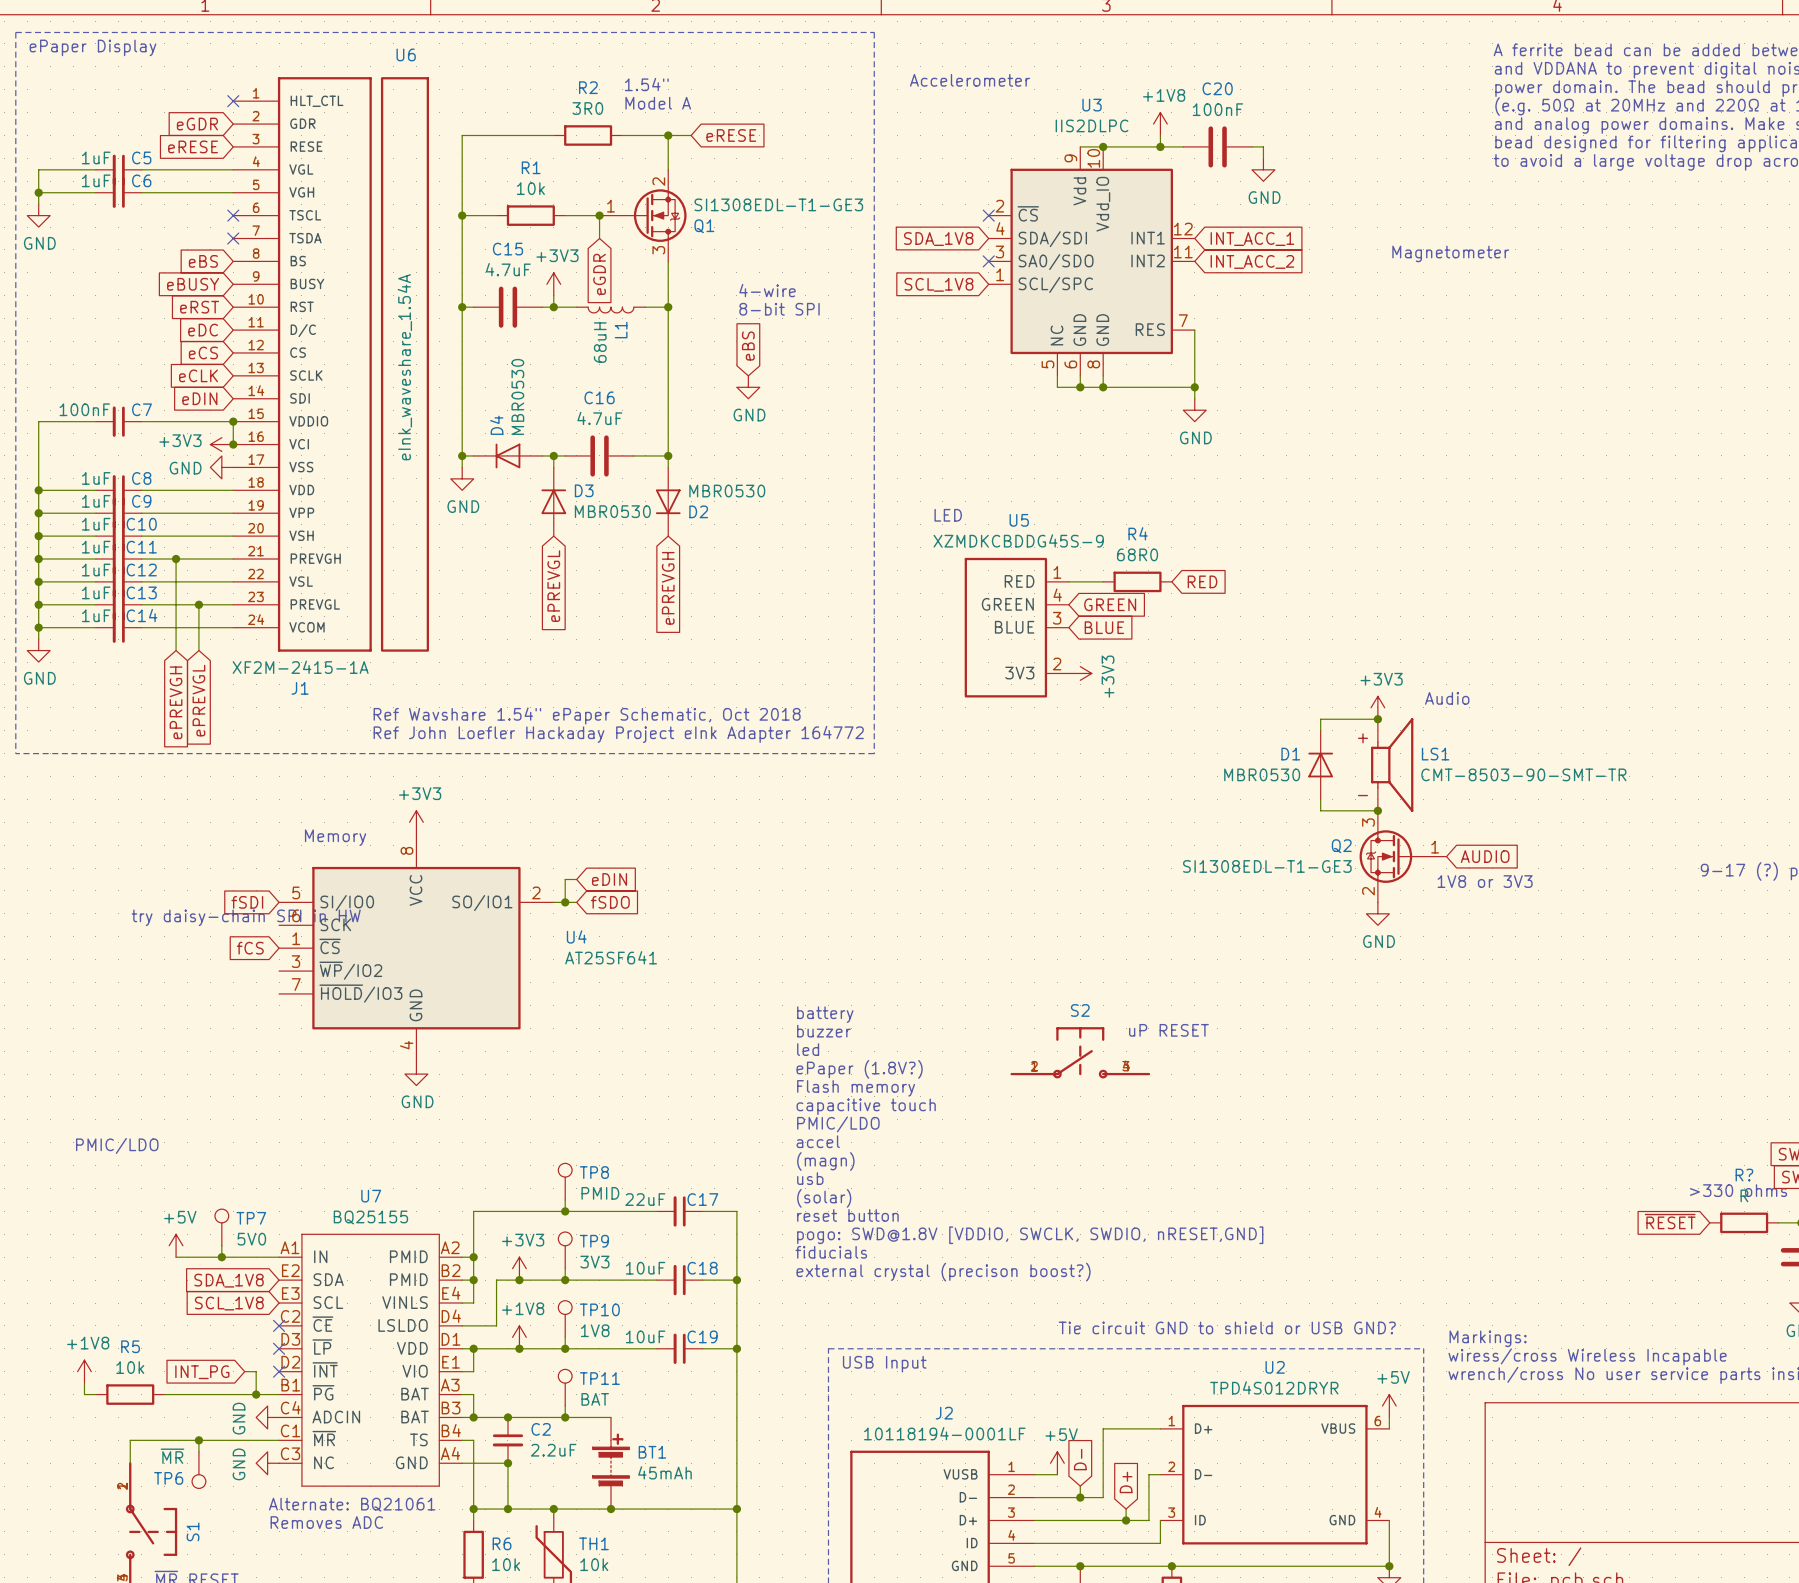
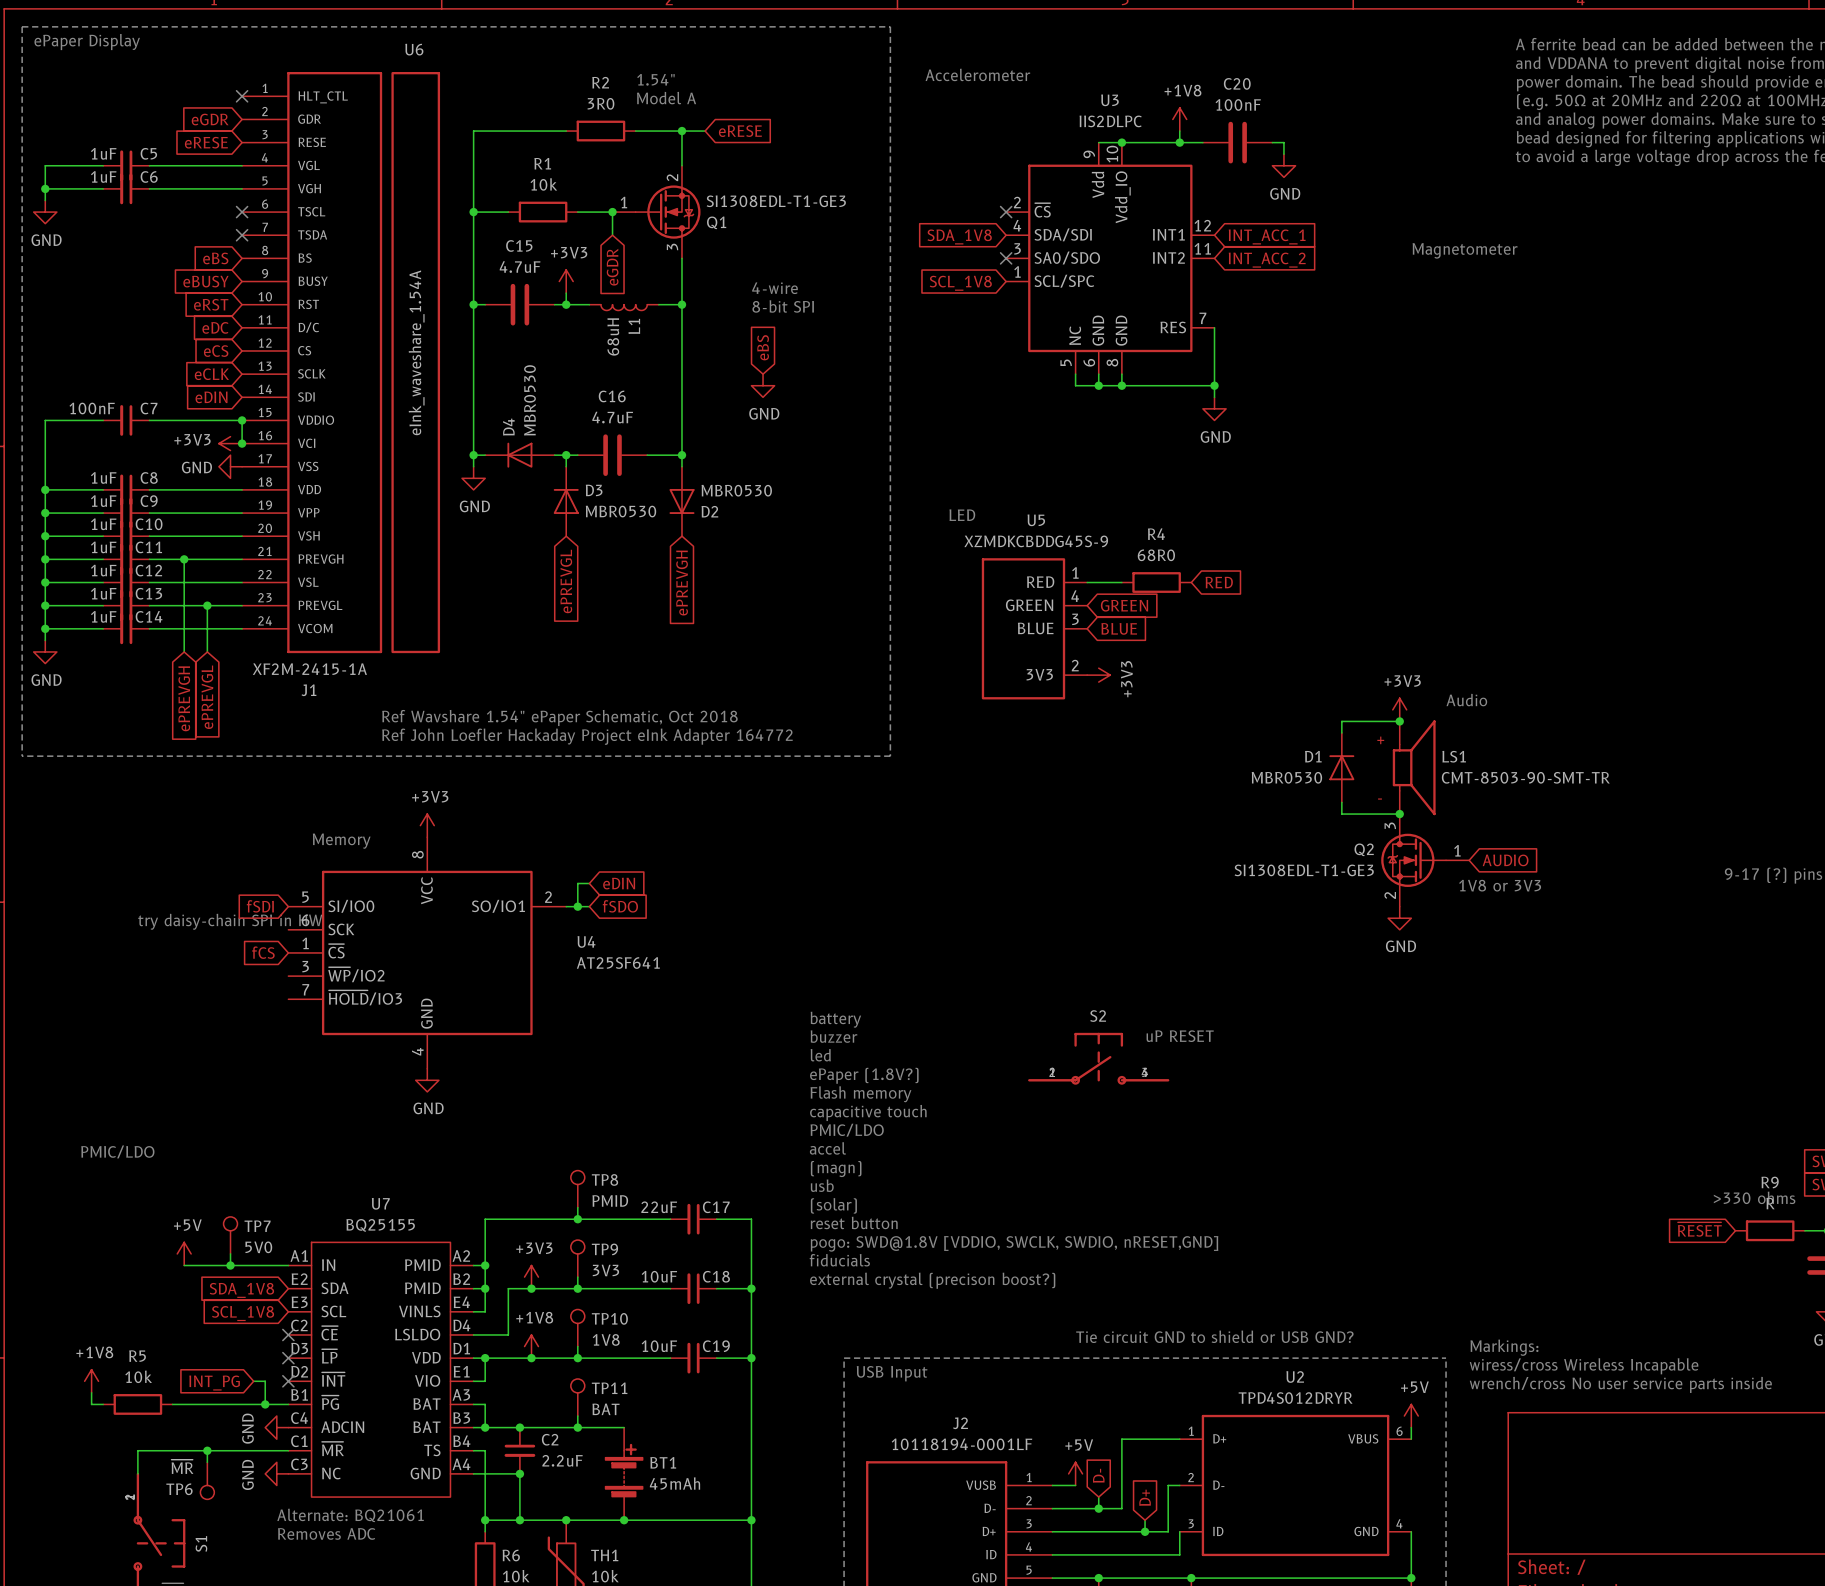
R? name: R? (1744, 1175) -> R9 (1770, 1182)

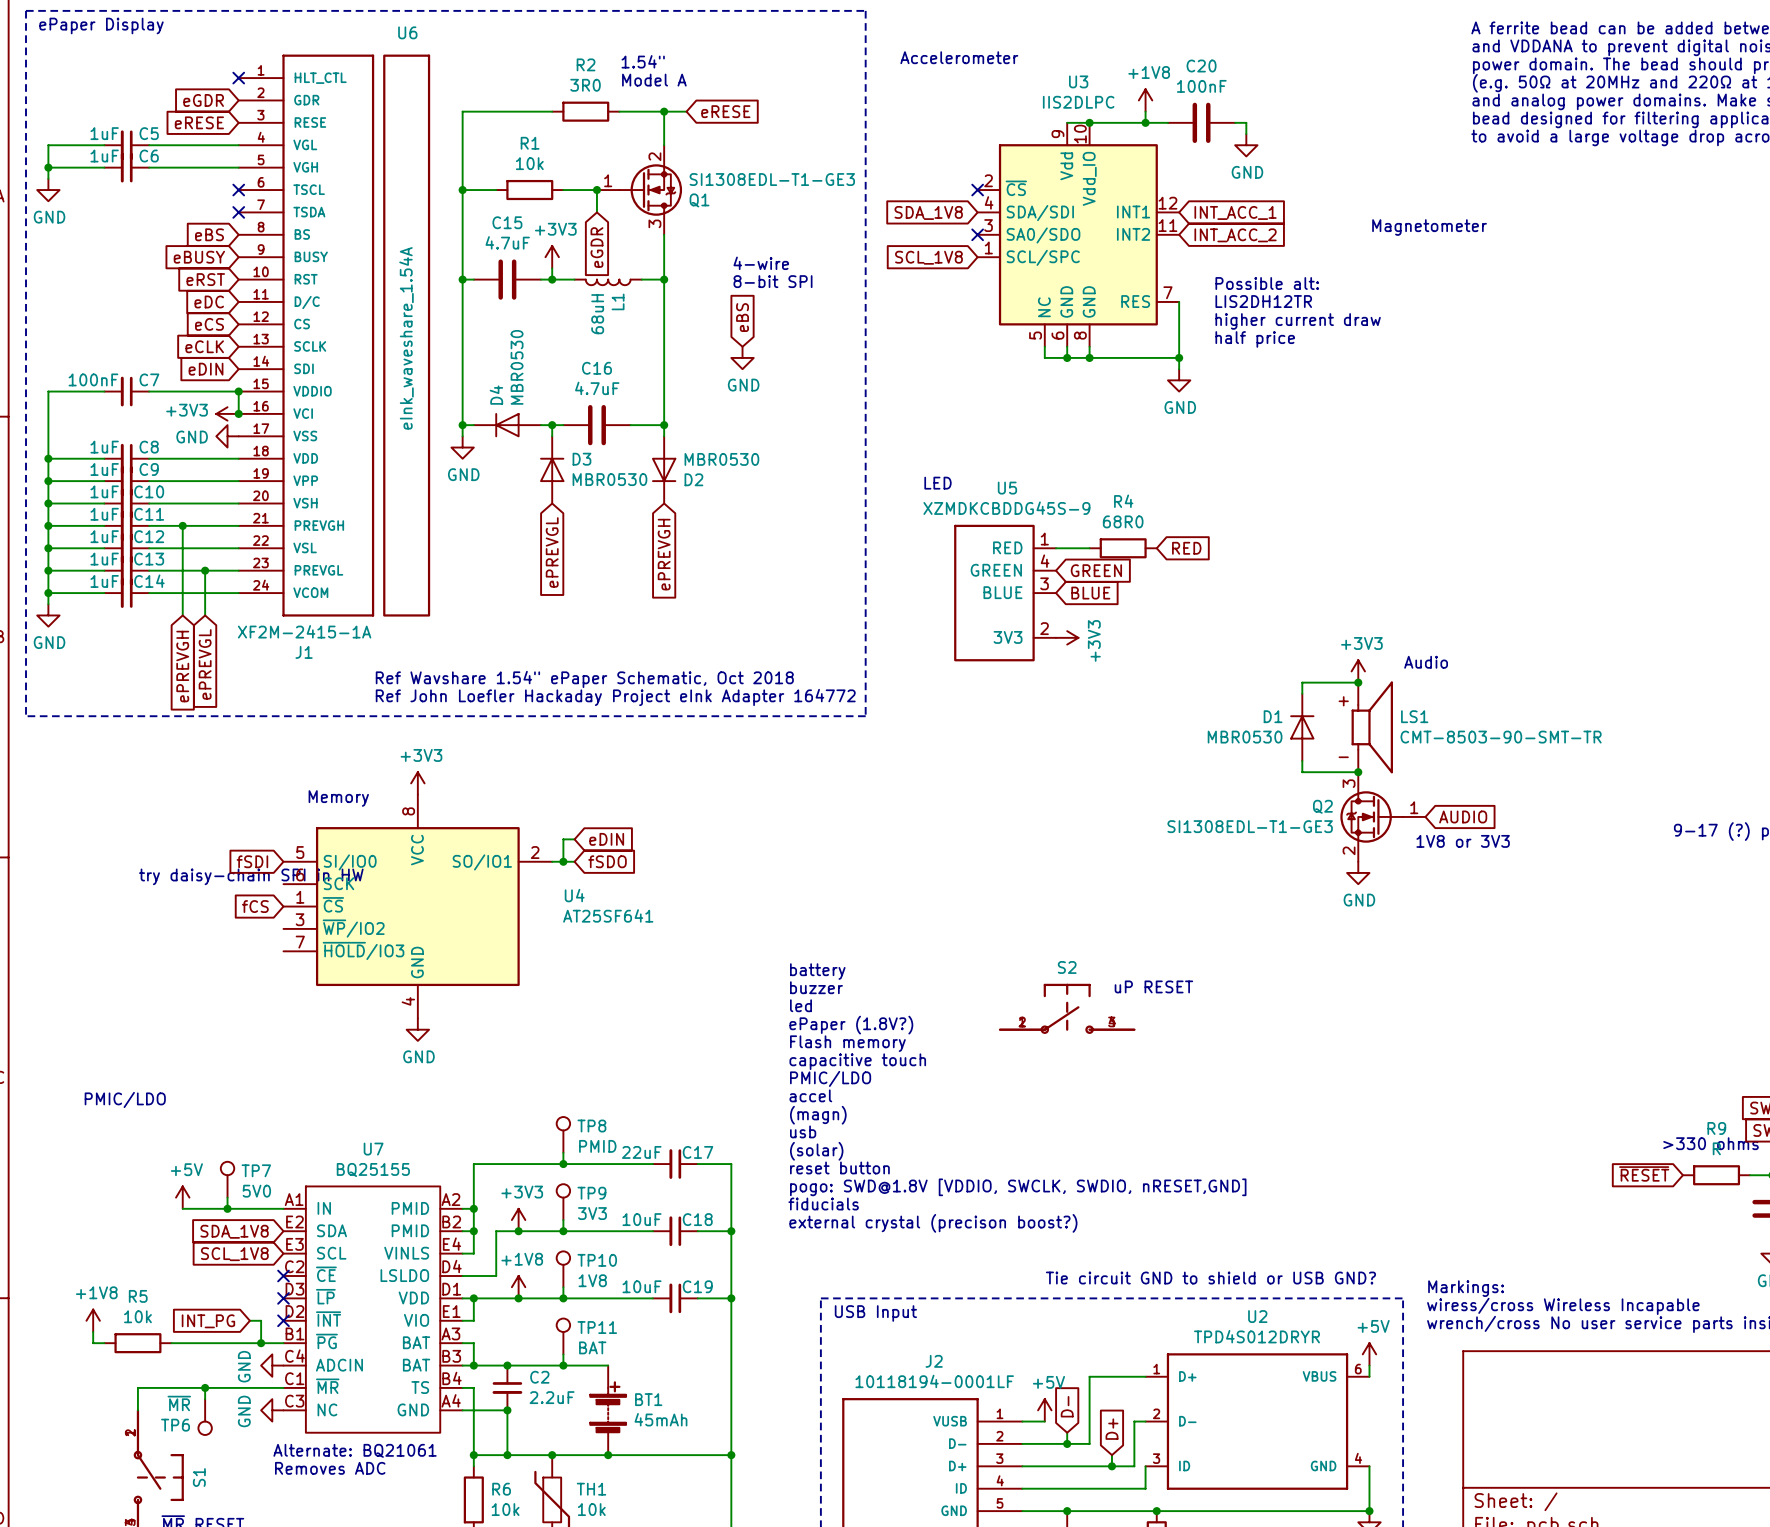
text: none -> Possible alt: (1267, 283)
text: none -> LIS2DH12TR (1263, 301)
text: none -> higher current draw (1298, 321)
text: none -> half price (1255, 339)

